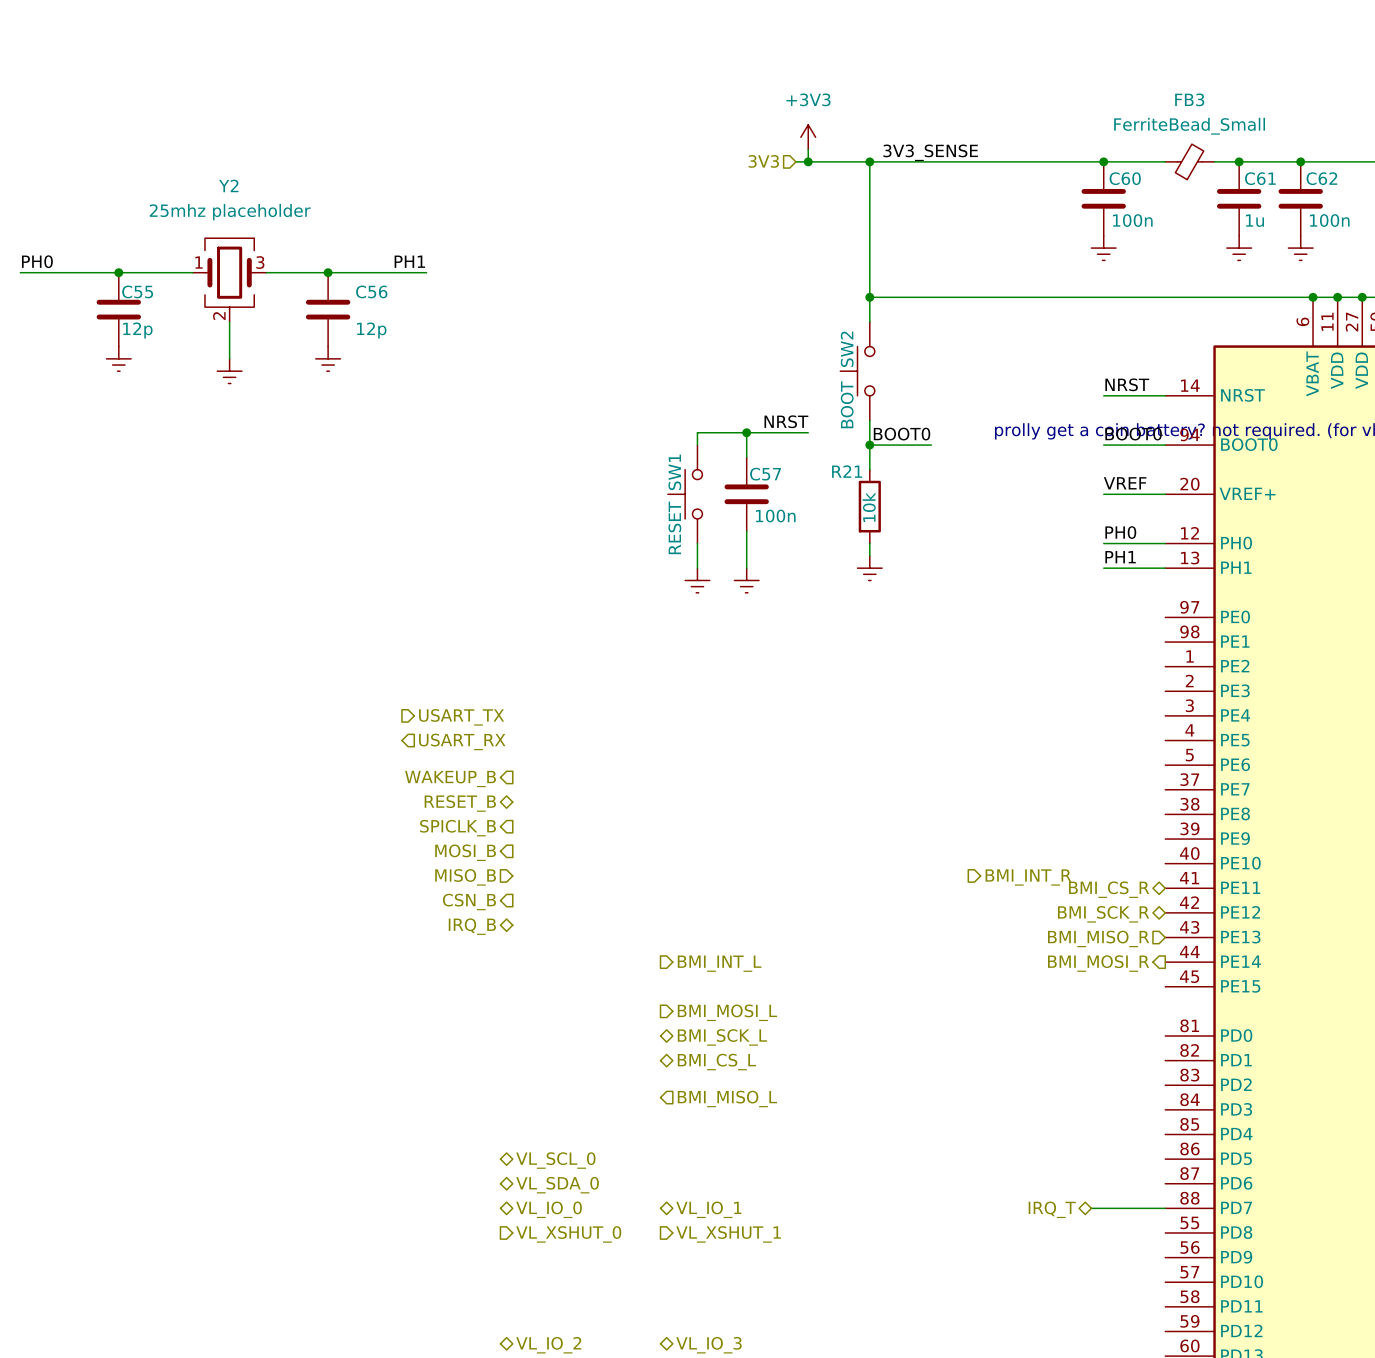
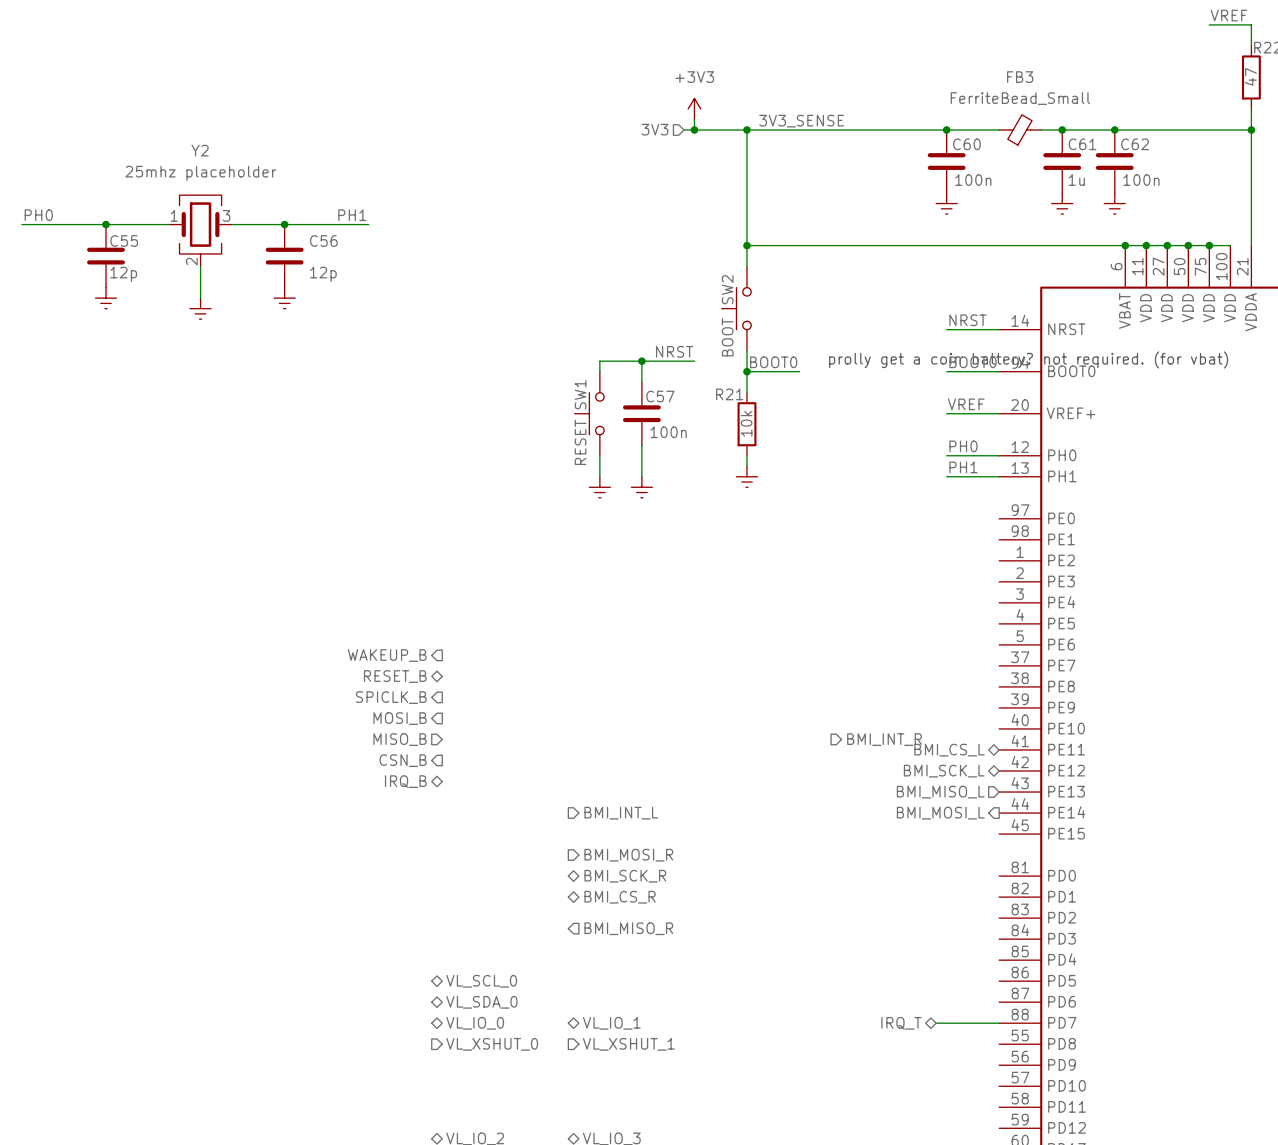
hierarchical label: USART_TX (461, 717) -> none
hierarchical label: USART_RX (462, 741) -> none
hierarchical label: BMI_CS_R (1109, 889) -> BMI_CS_L (949, 750)
hierarchical label: BMI_SCK_R (1103, 914) -> BMI_SCK_L (944, 771)
hierarchical label: BMI_MISO_R (1098, 938) -> BMI_MISO_L (940, 792)
hierarchical label: BMI_MOSI_R (1098, 963) -> BMI_MOSI_L (940, 813)
hierarchical label: BMI_MOSI_L (727, 1012) -> BMI_MOSI_R (628, 855)
hierarchical label: BMI_SCK_L (722, 1037) -> BMI_SCK_R (625, 876)
hierarchical label: BMI_CS_L (716, 1062) -> BMI_CS_R (620, 897)
hierarchical label: BMI_MISO_L (727, 1098) -> BMI_MISO_R (628, 928)

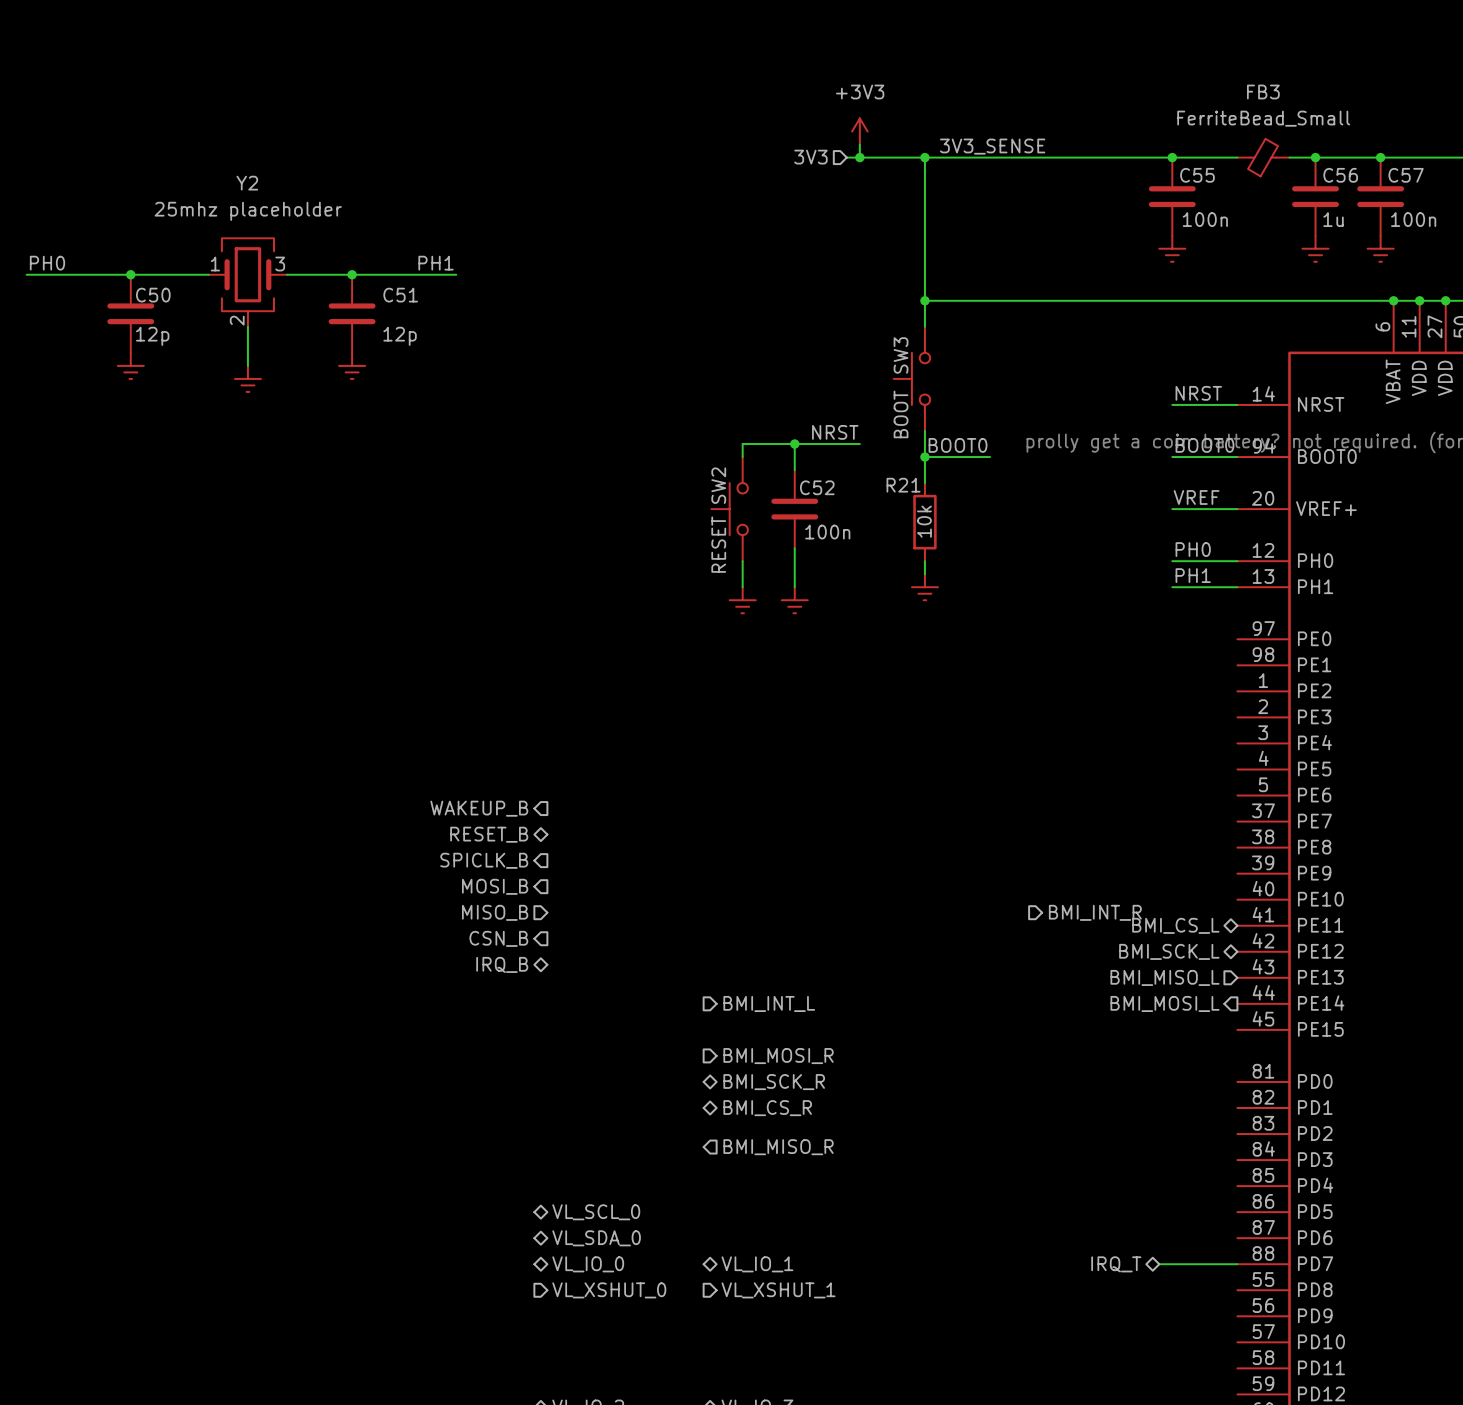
C60 name: C60 (966, 144) -> C55 (1197, 175)
C61 name: C61 (1082, 144) -> C56 (1340, 175)
C62 name: C62 (1135, 144) -> C57 (1406, 175)
C55 name: C55 (124, 240) -> C50 (153, 295)
C56 name: C56 (323, 240) -> C51 (400, 295)
SW2 name: SW2 (727, 289) -> SW3 (901, 355)
SW1 name: SW1 (580, 394) -> SW2 (718, 485)
C57 name: C57 (660, 396) -> C52 (817, 487)

